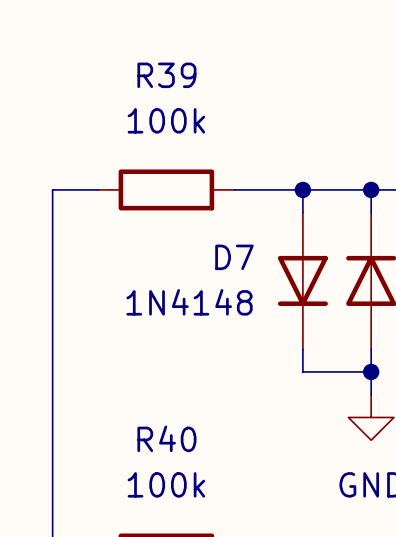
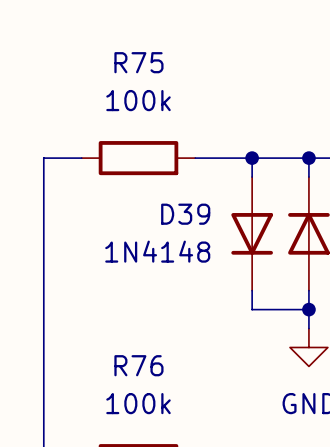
R39 name: R39 (166, 75) -> R75 (138, 62)
D7 name: D7 (234, 257) -> D39 (185, 214)
R40 name: R40 (166, 438) -> R76 (138, 365)

